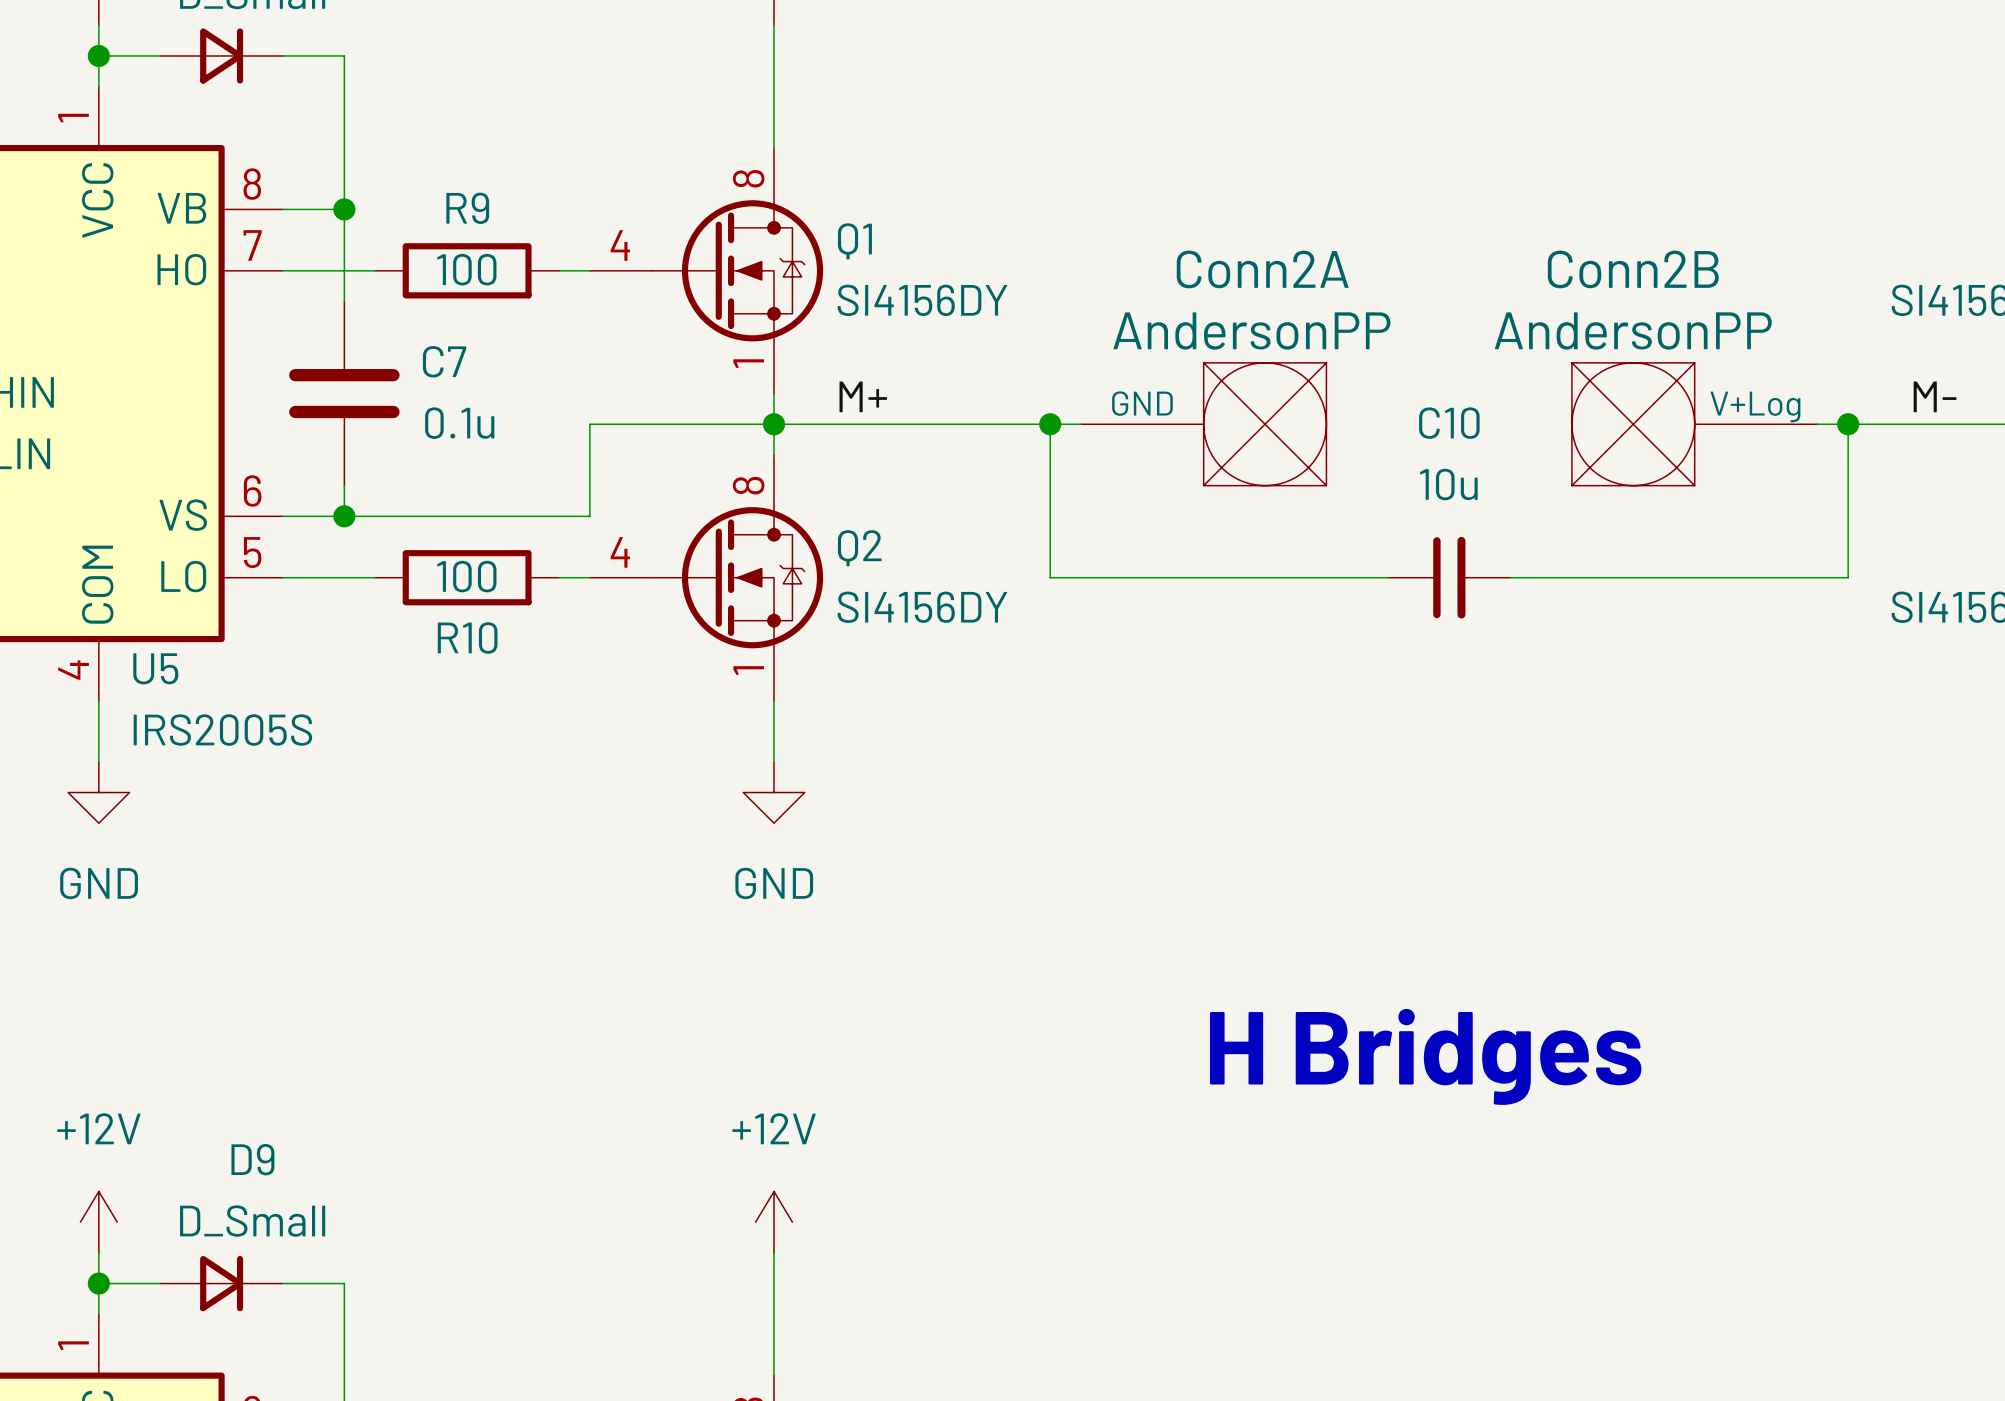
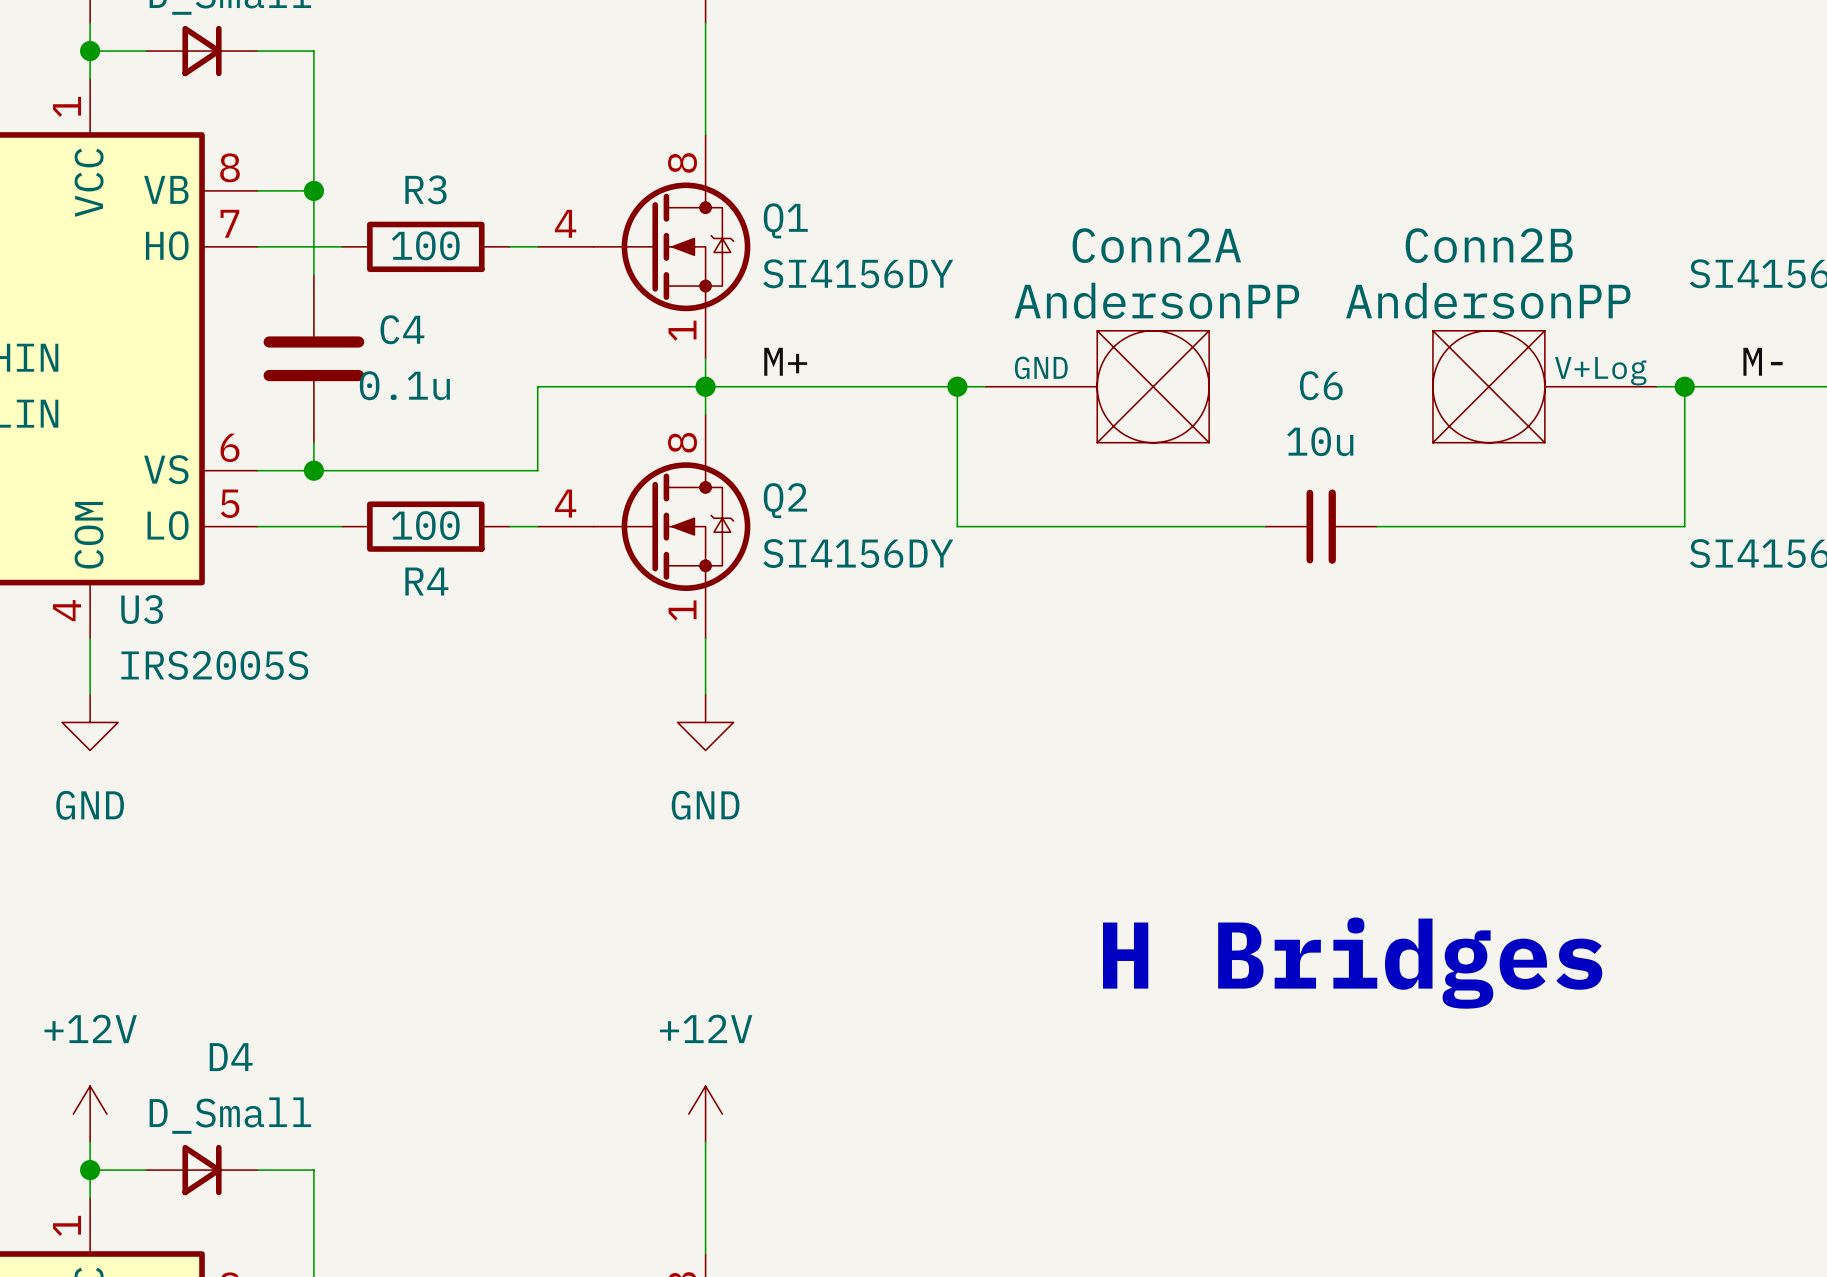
R9 name: R9 (467, 208) -> R3 (425, 189)
C7 name: C7 (444, 361) -> C4 (402, 329)
C10 name: C10 (1449, 423) -> C6 (1321, 385)
R10 name: R10 (467, 637) -> R4 (426, 581)
U5 name: U5 (155, 668) -> U3 (142, 609)
D9 name: D9 (252, 1159) -> D4 (231, 1057)

